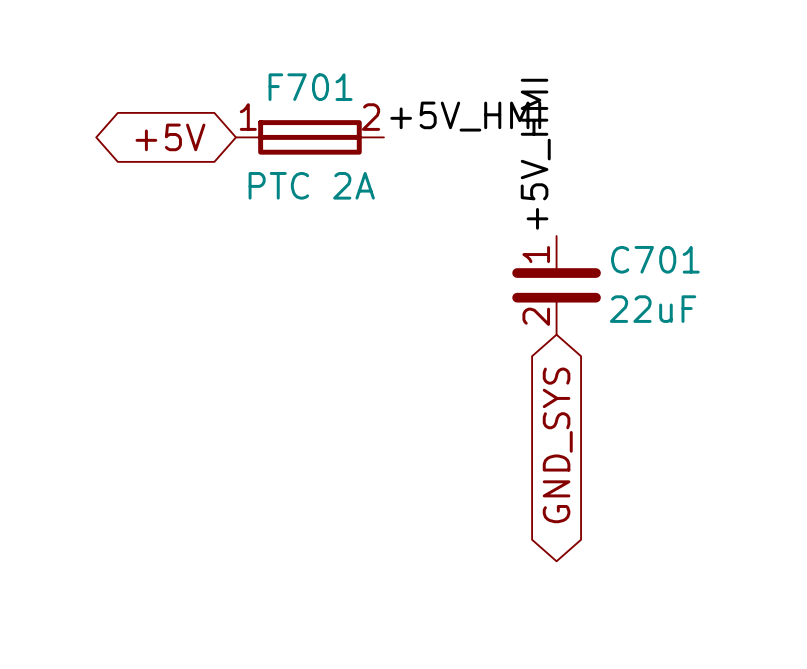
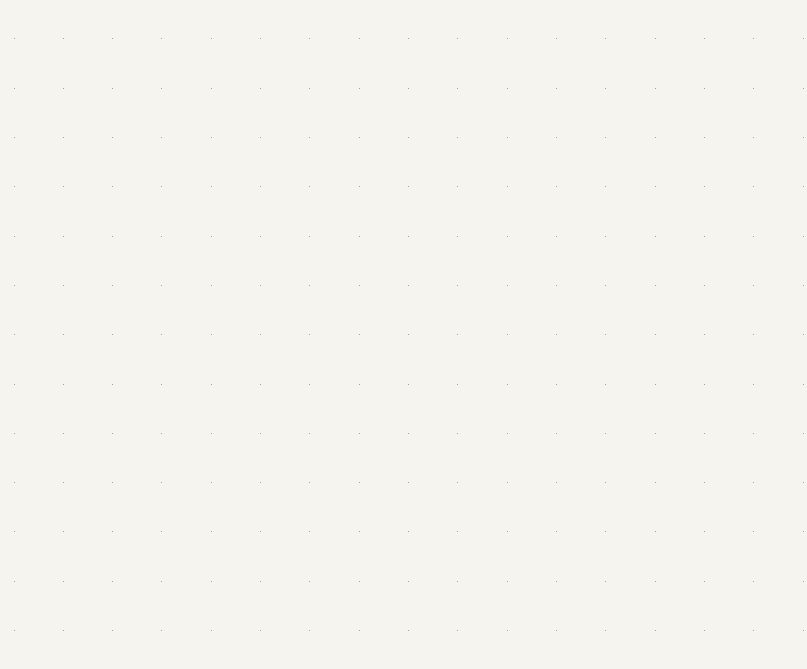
label: +5V_HMI (465, 116) -> none
global label: +5V (170, 137) -> none
F701: PTC 2A (309, 137) -> none
label: +5V_HMI (535, 154) -> none
C701: 22uF (556, 285) -> none
global label: GND_SYS (557, 445) -> none

